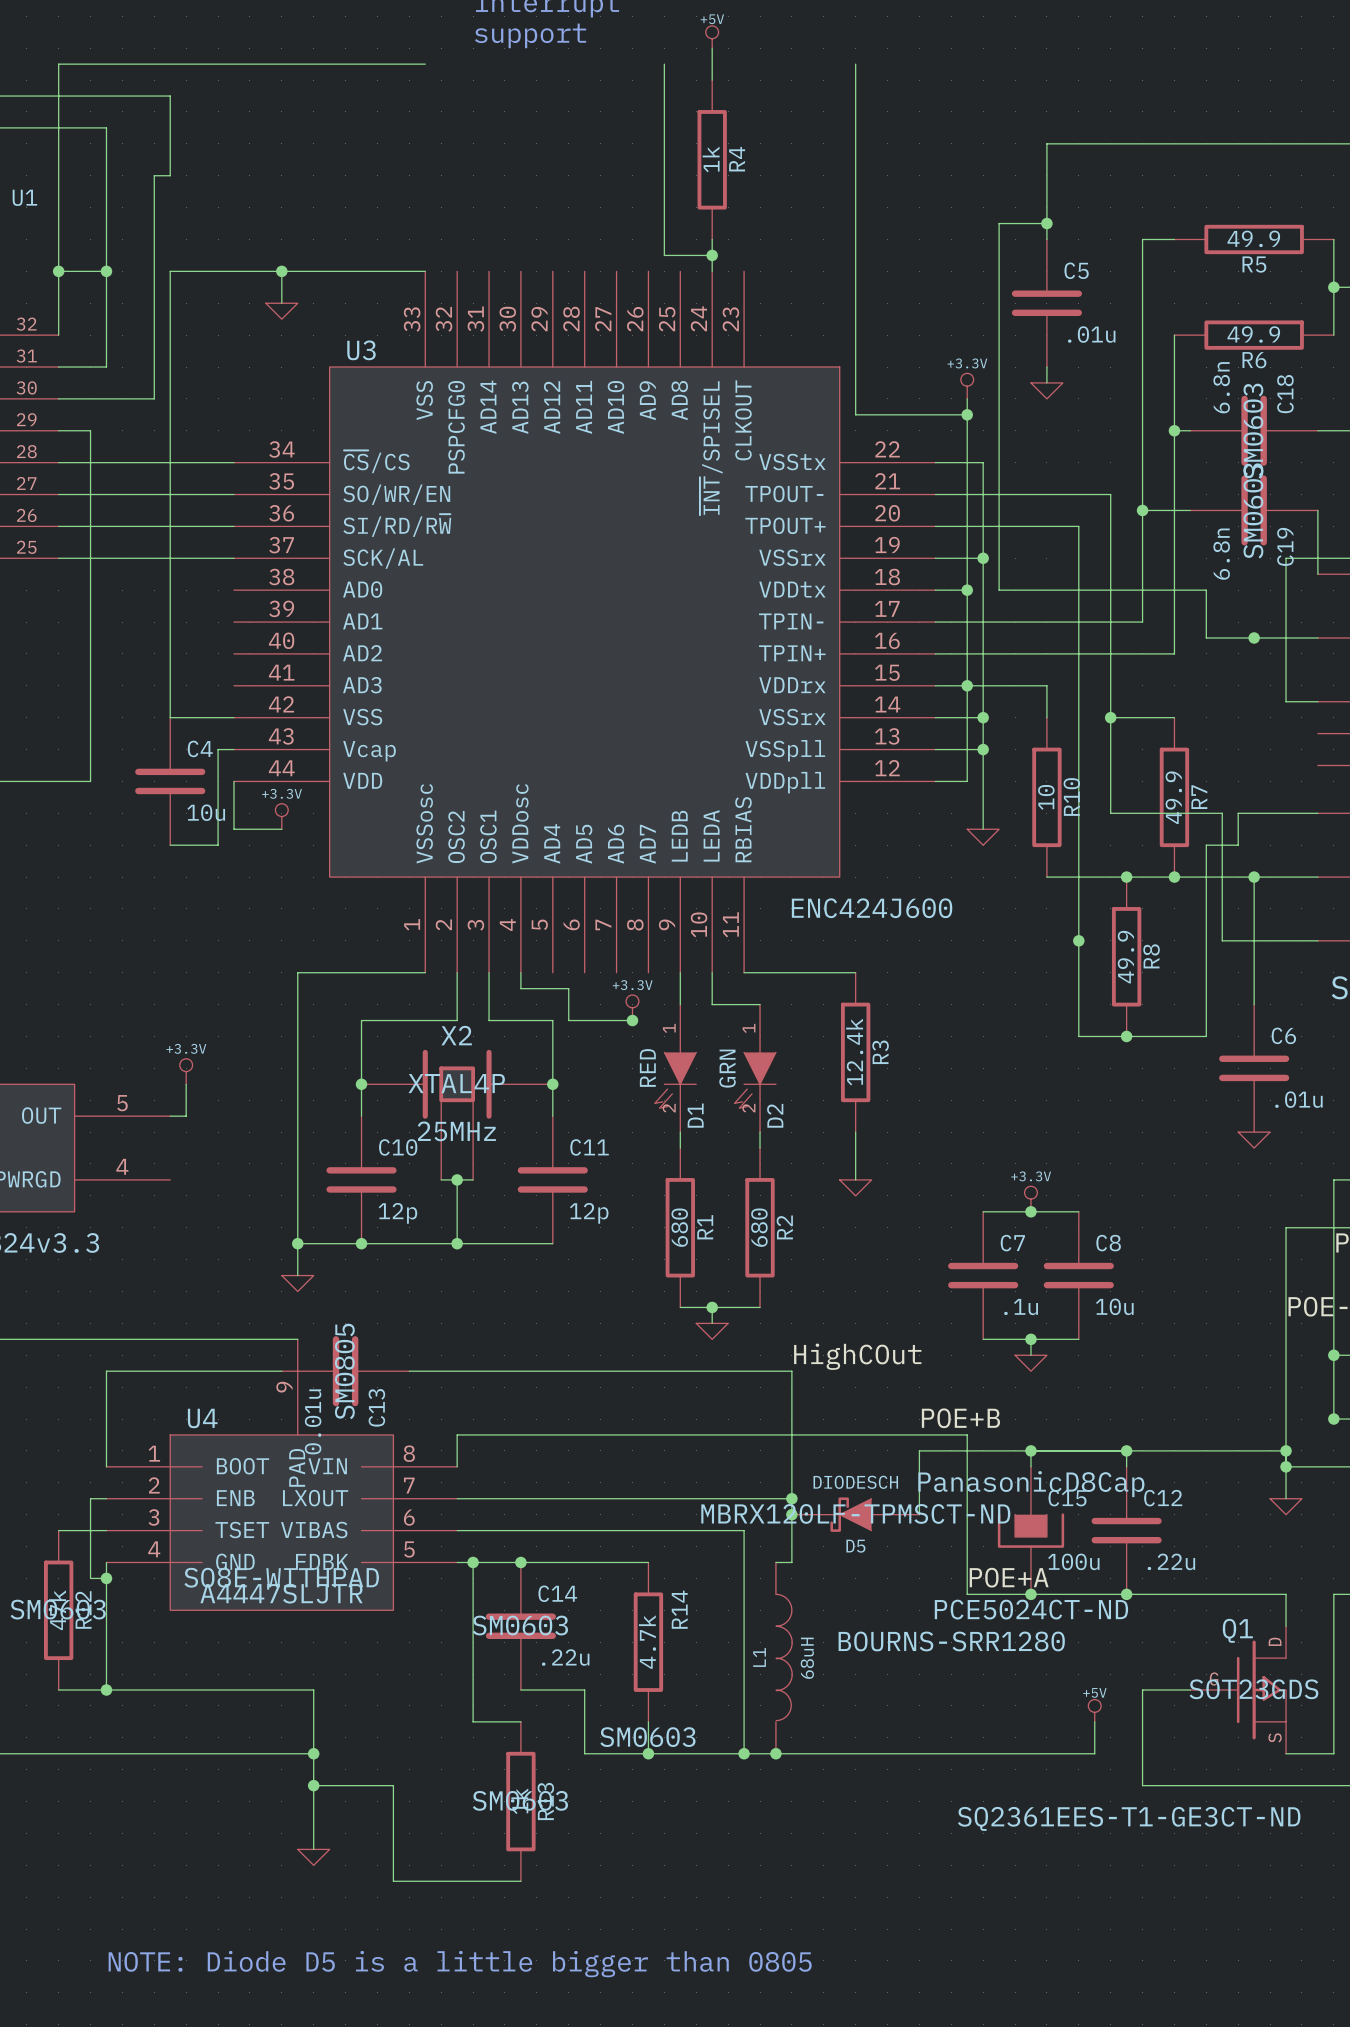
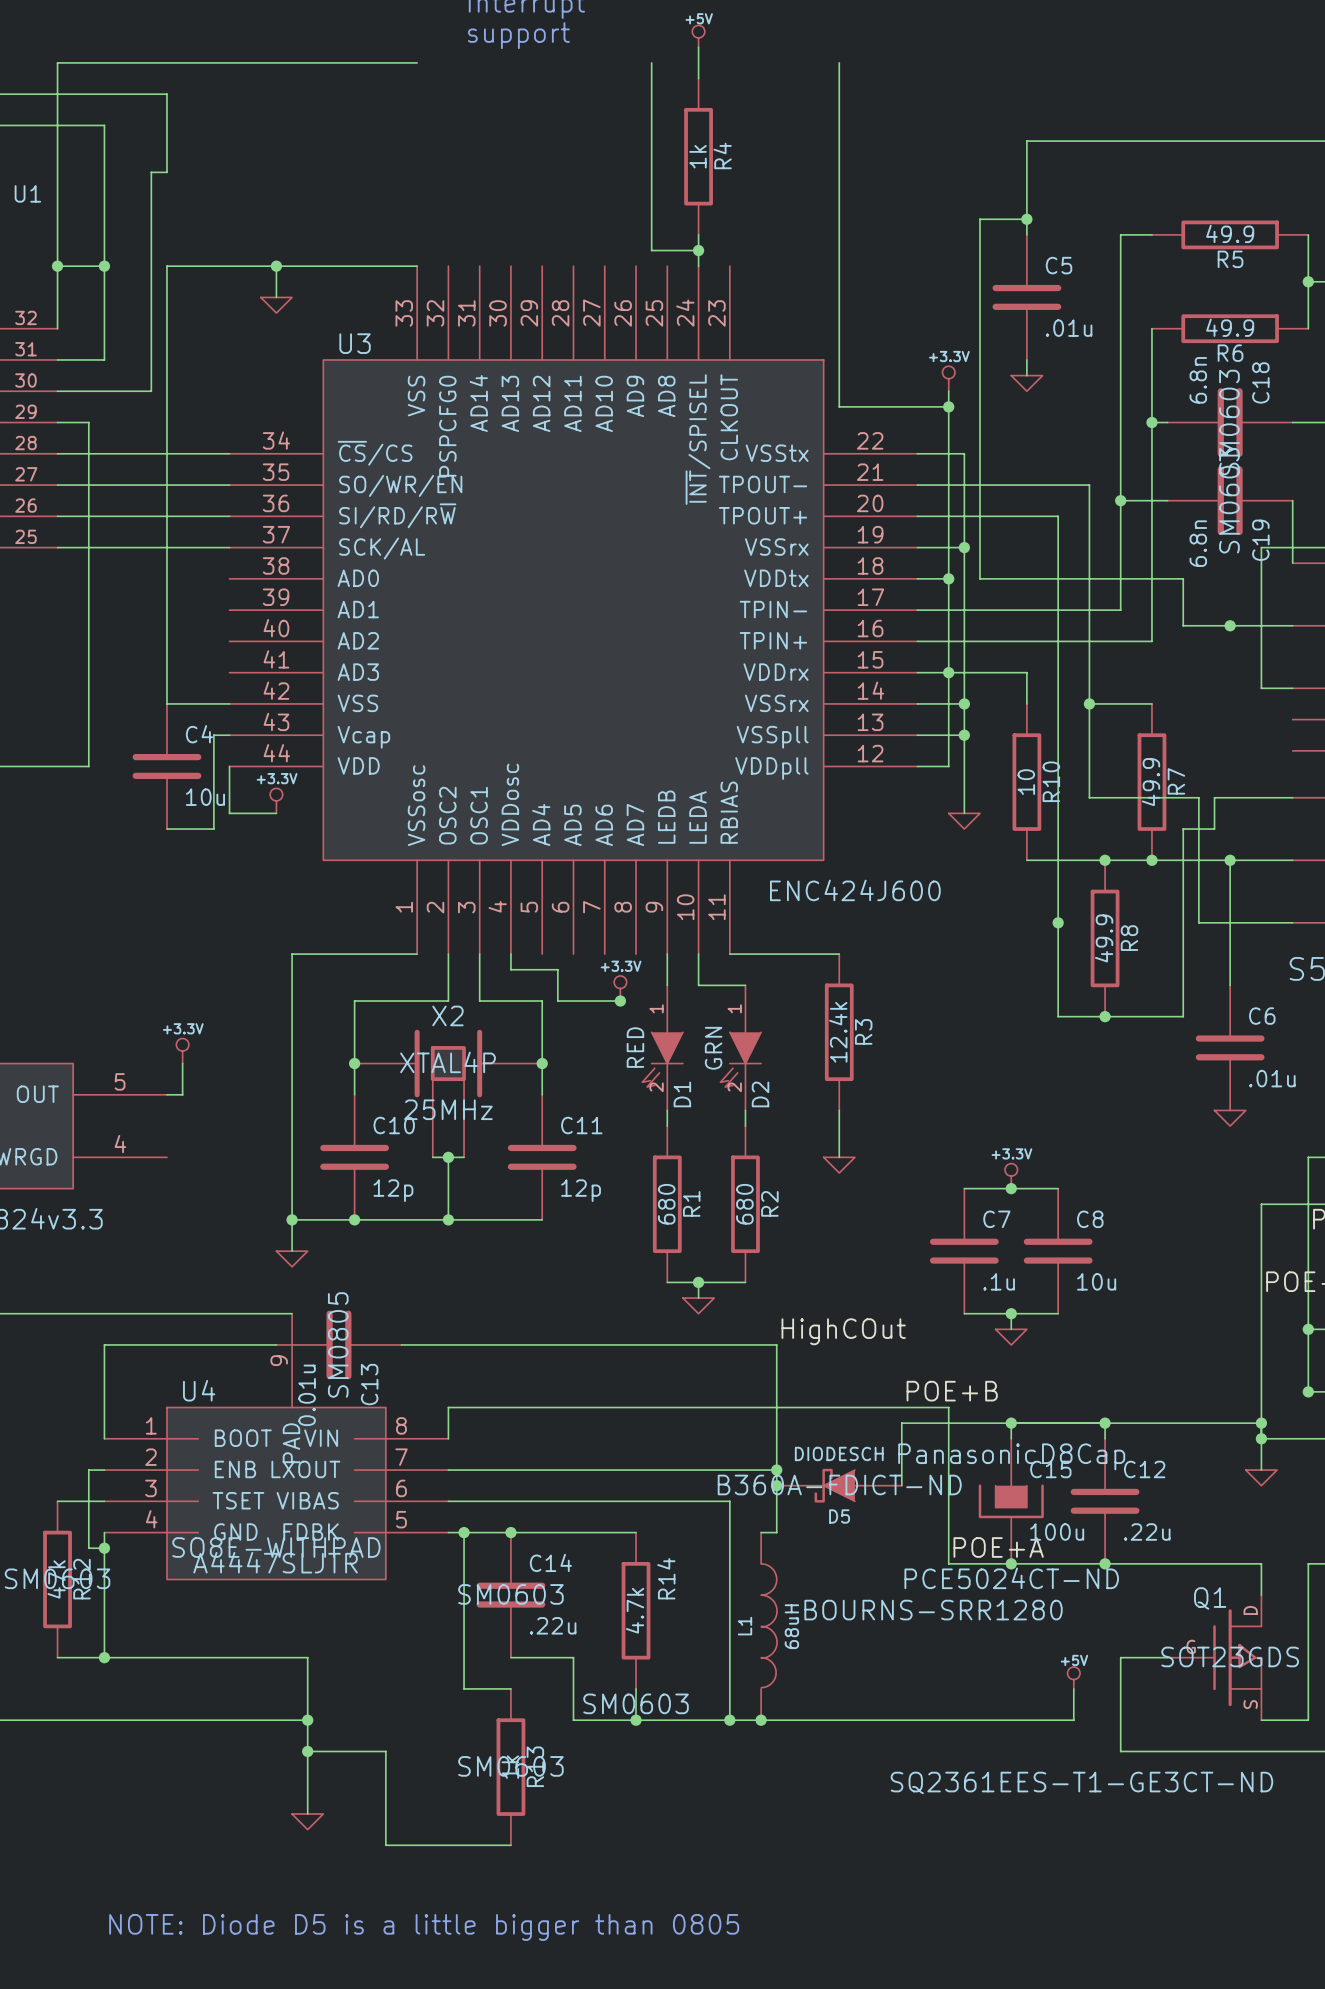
D5 text: MBRX120LF-TPMSCT-ND (855, 1513) -> none
D5 text: none -> B360A-FDICT-ND (839, 1484)

